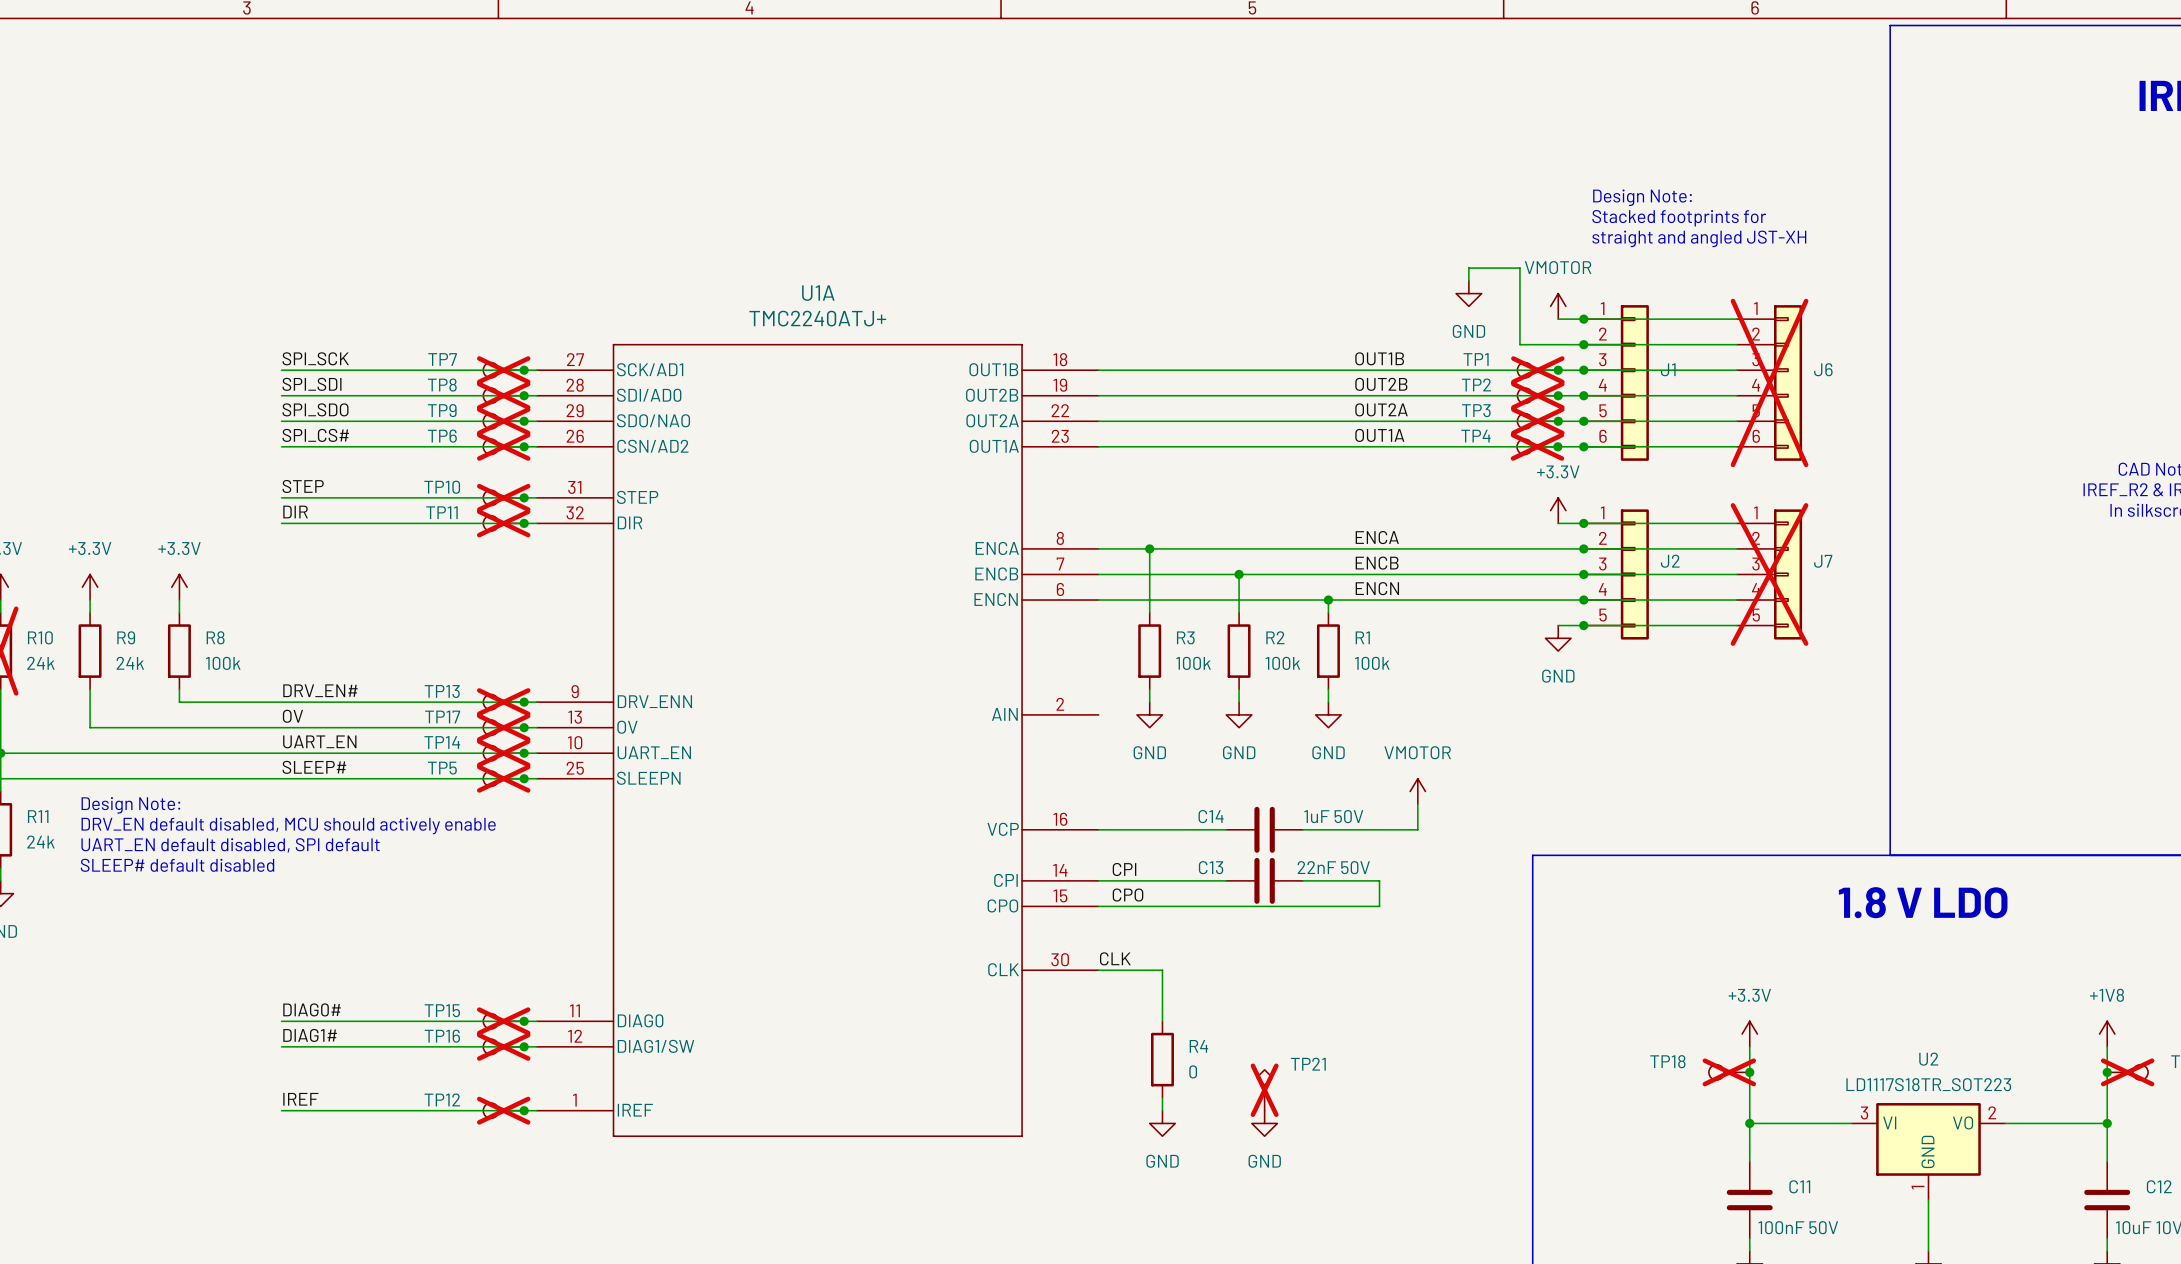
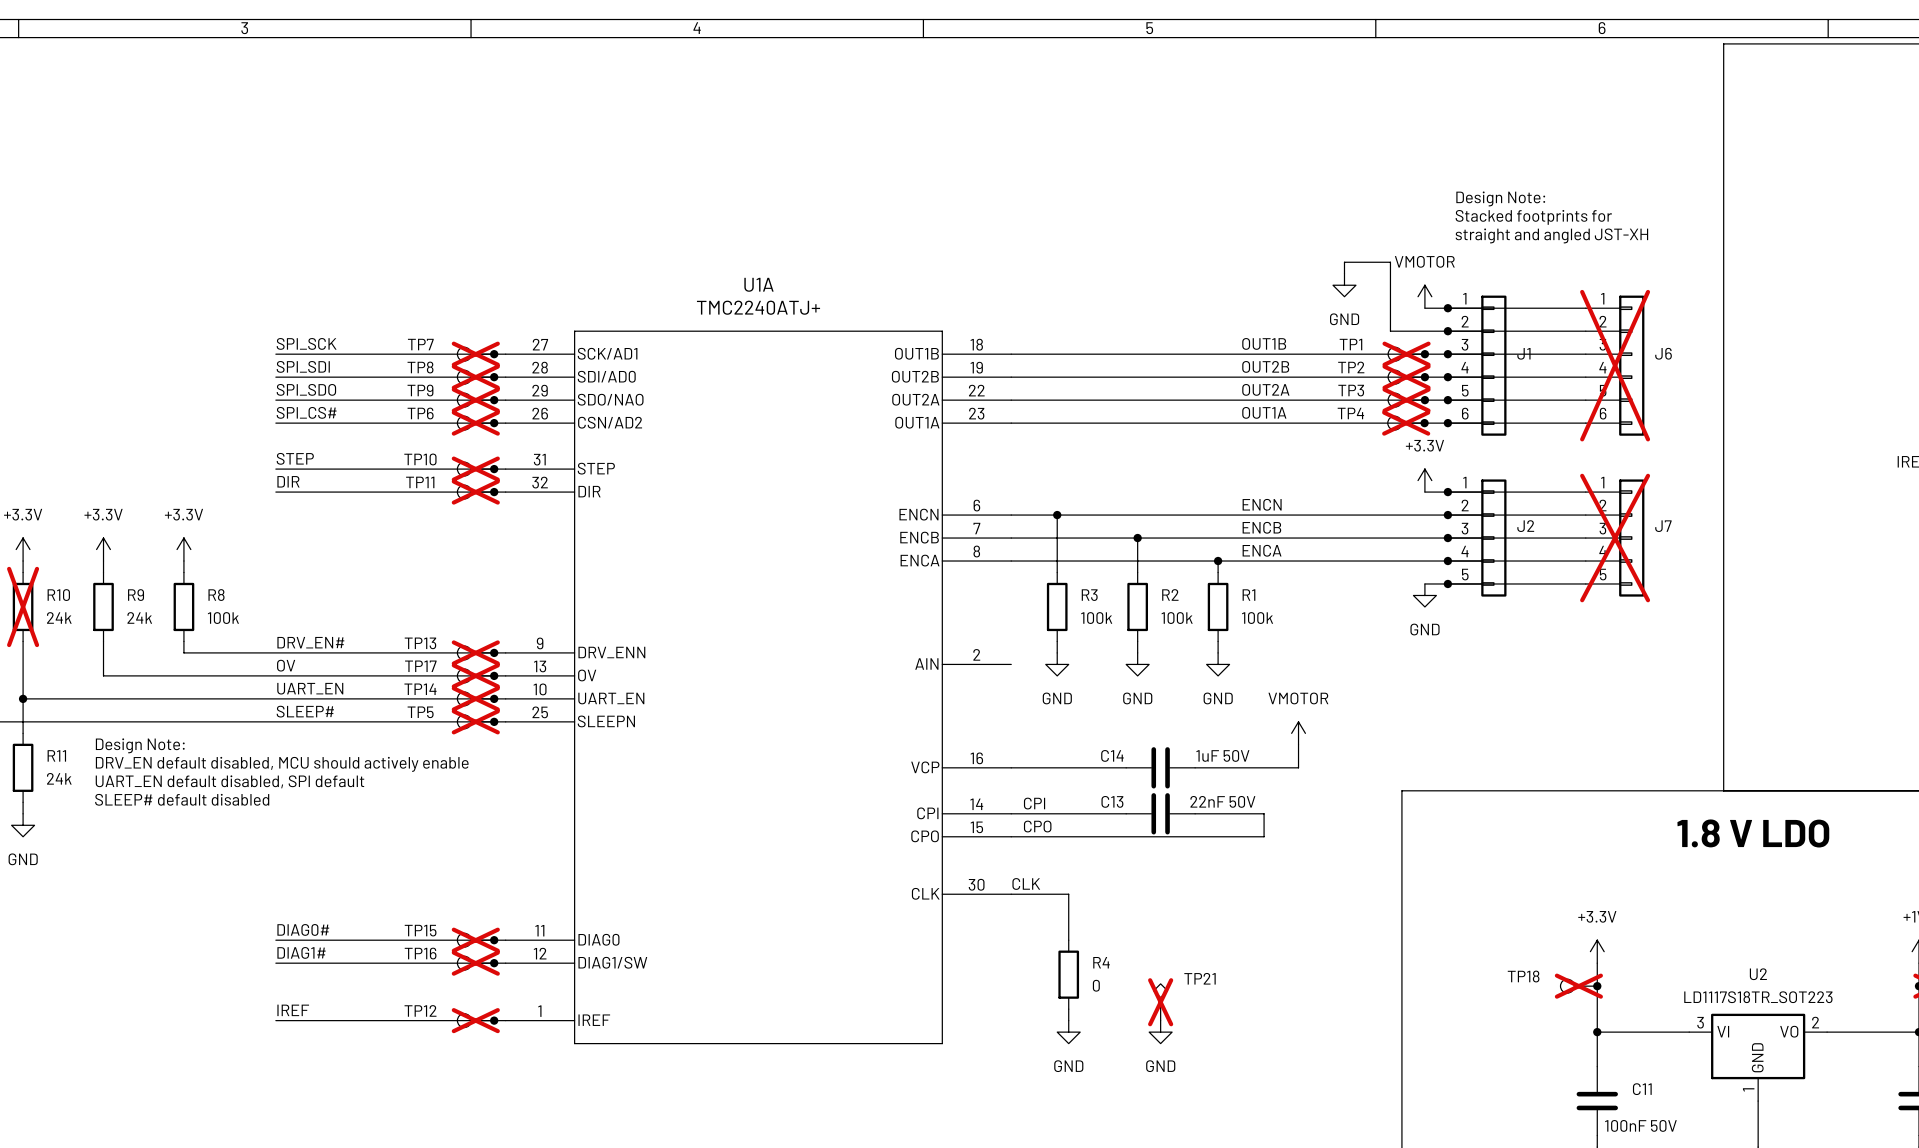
label: ENCA (1377, 537) -> ENCN (1262, 504)
U1A pin number: 8 (1060, 538) -> 6 (976, 505)
U1A pin name: ENCA (997, 548) -> ENCN (918, 514)
label: ENCN (1377, 588) -> ENCA (1262, 550)
U1A pin number: 6 (1060, 589) -> 8 (976, 551)
U1A pin name: ENCN (996, 599) -> ENCA (920, 560)

